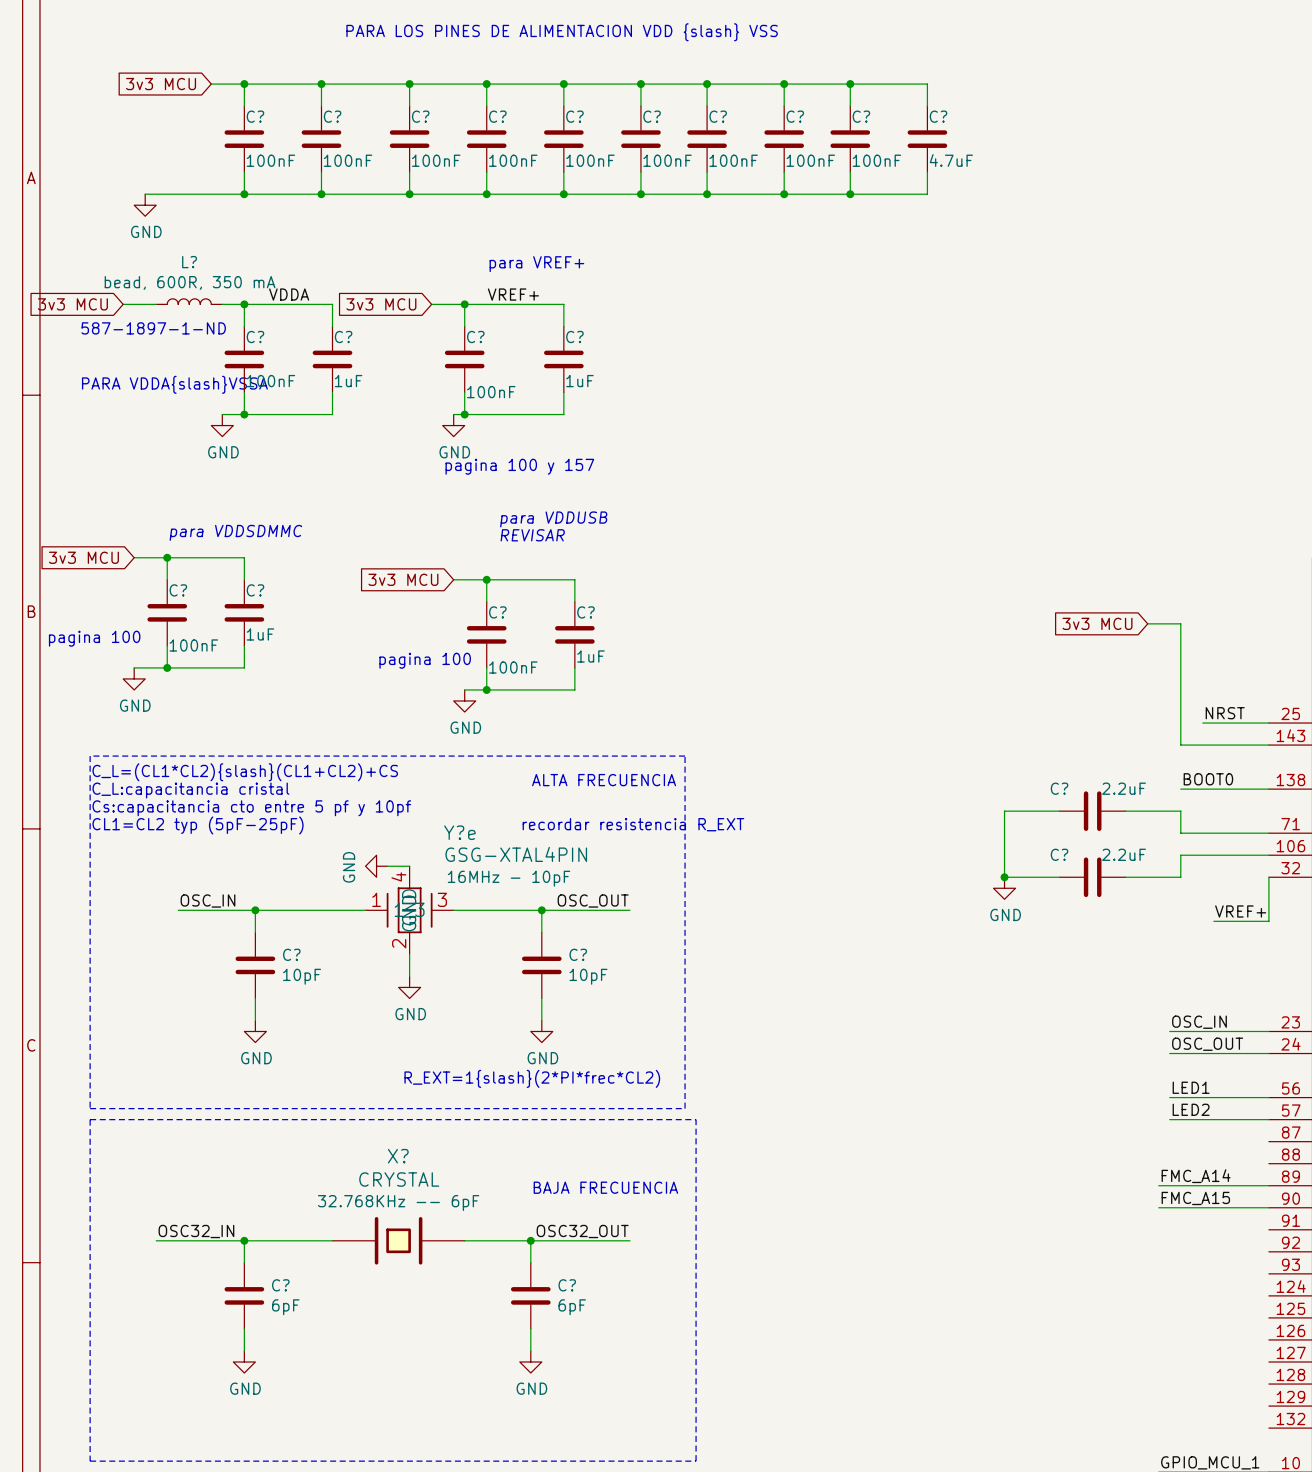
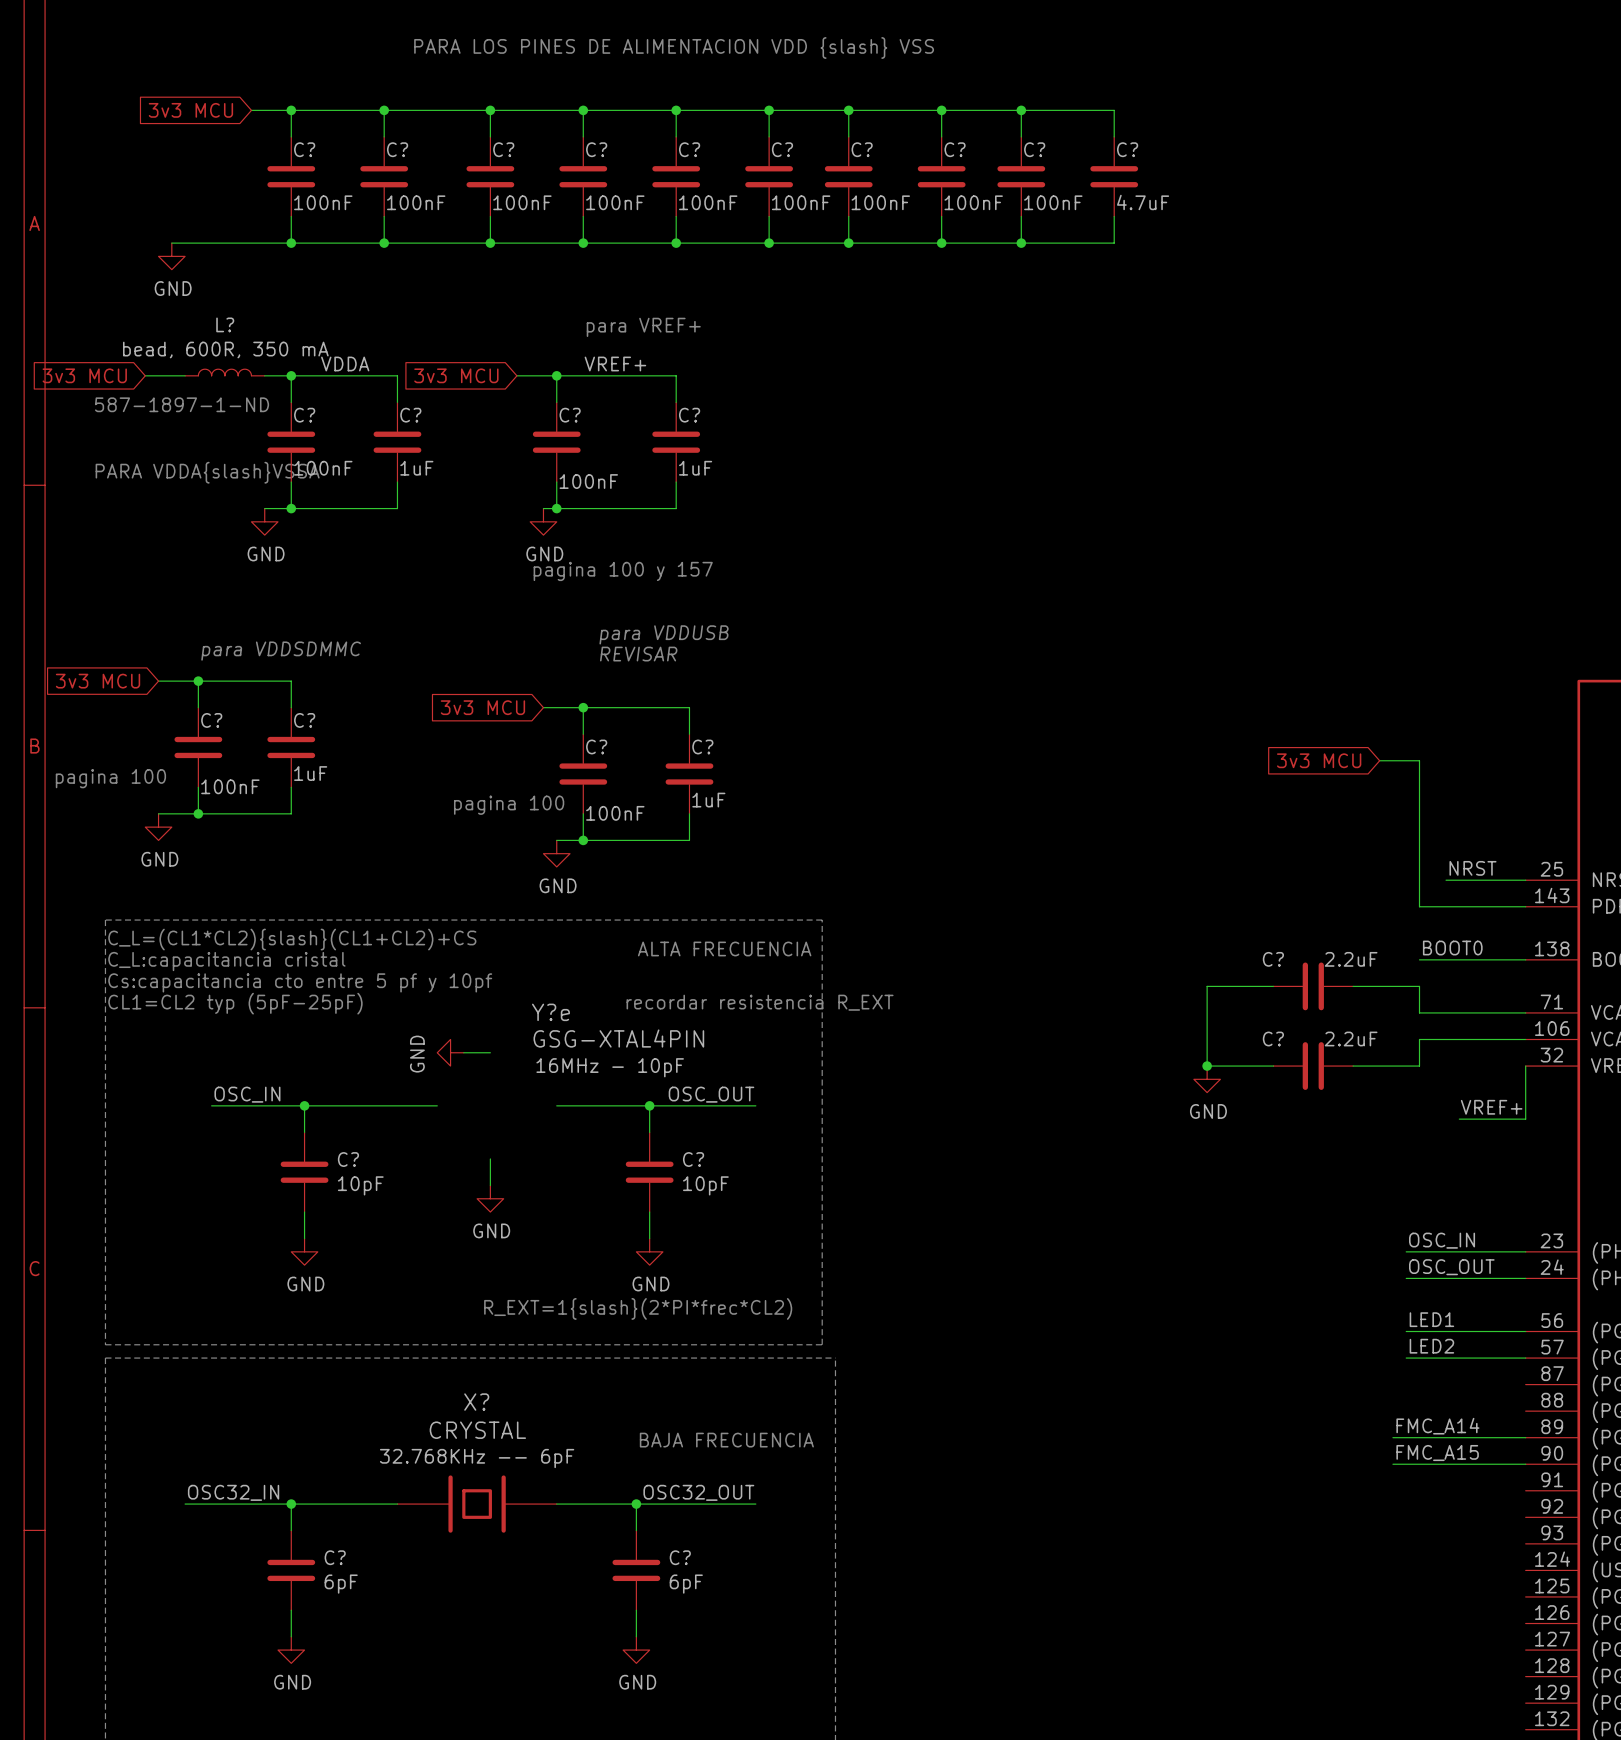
Y?e: GSG-XTAL4PIN (409, 910) -> none
wire: (453, 910) (464, 910) -> none

